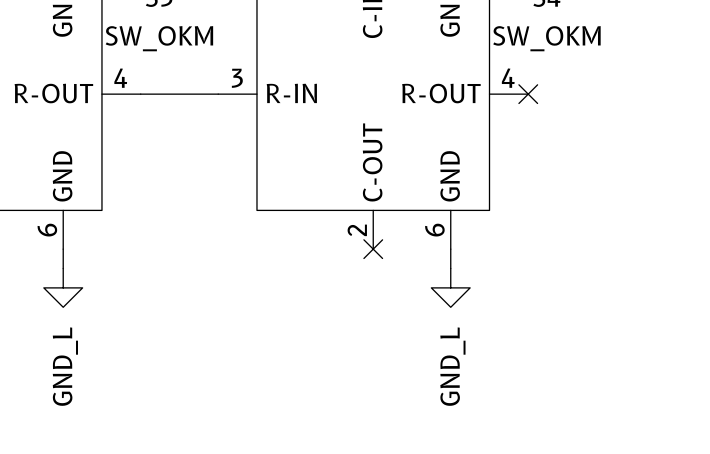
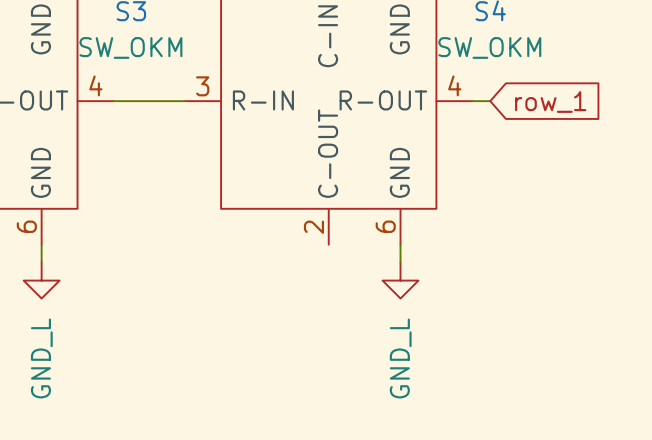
wire: none -> (472, 101) (490, 101)
no-connect mark: (528, 94) -> none
global label: none -> row_1 (550, 102)
no-connect mark: (373, 249) -> none

